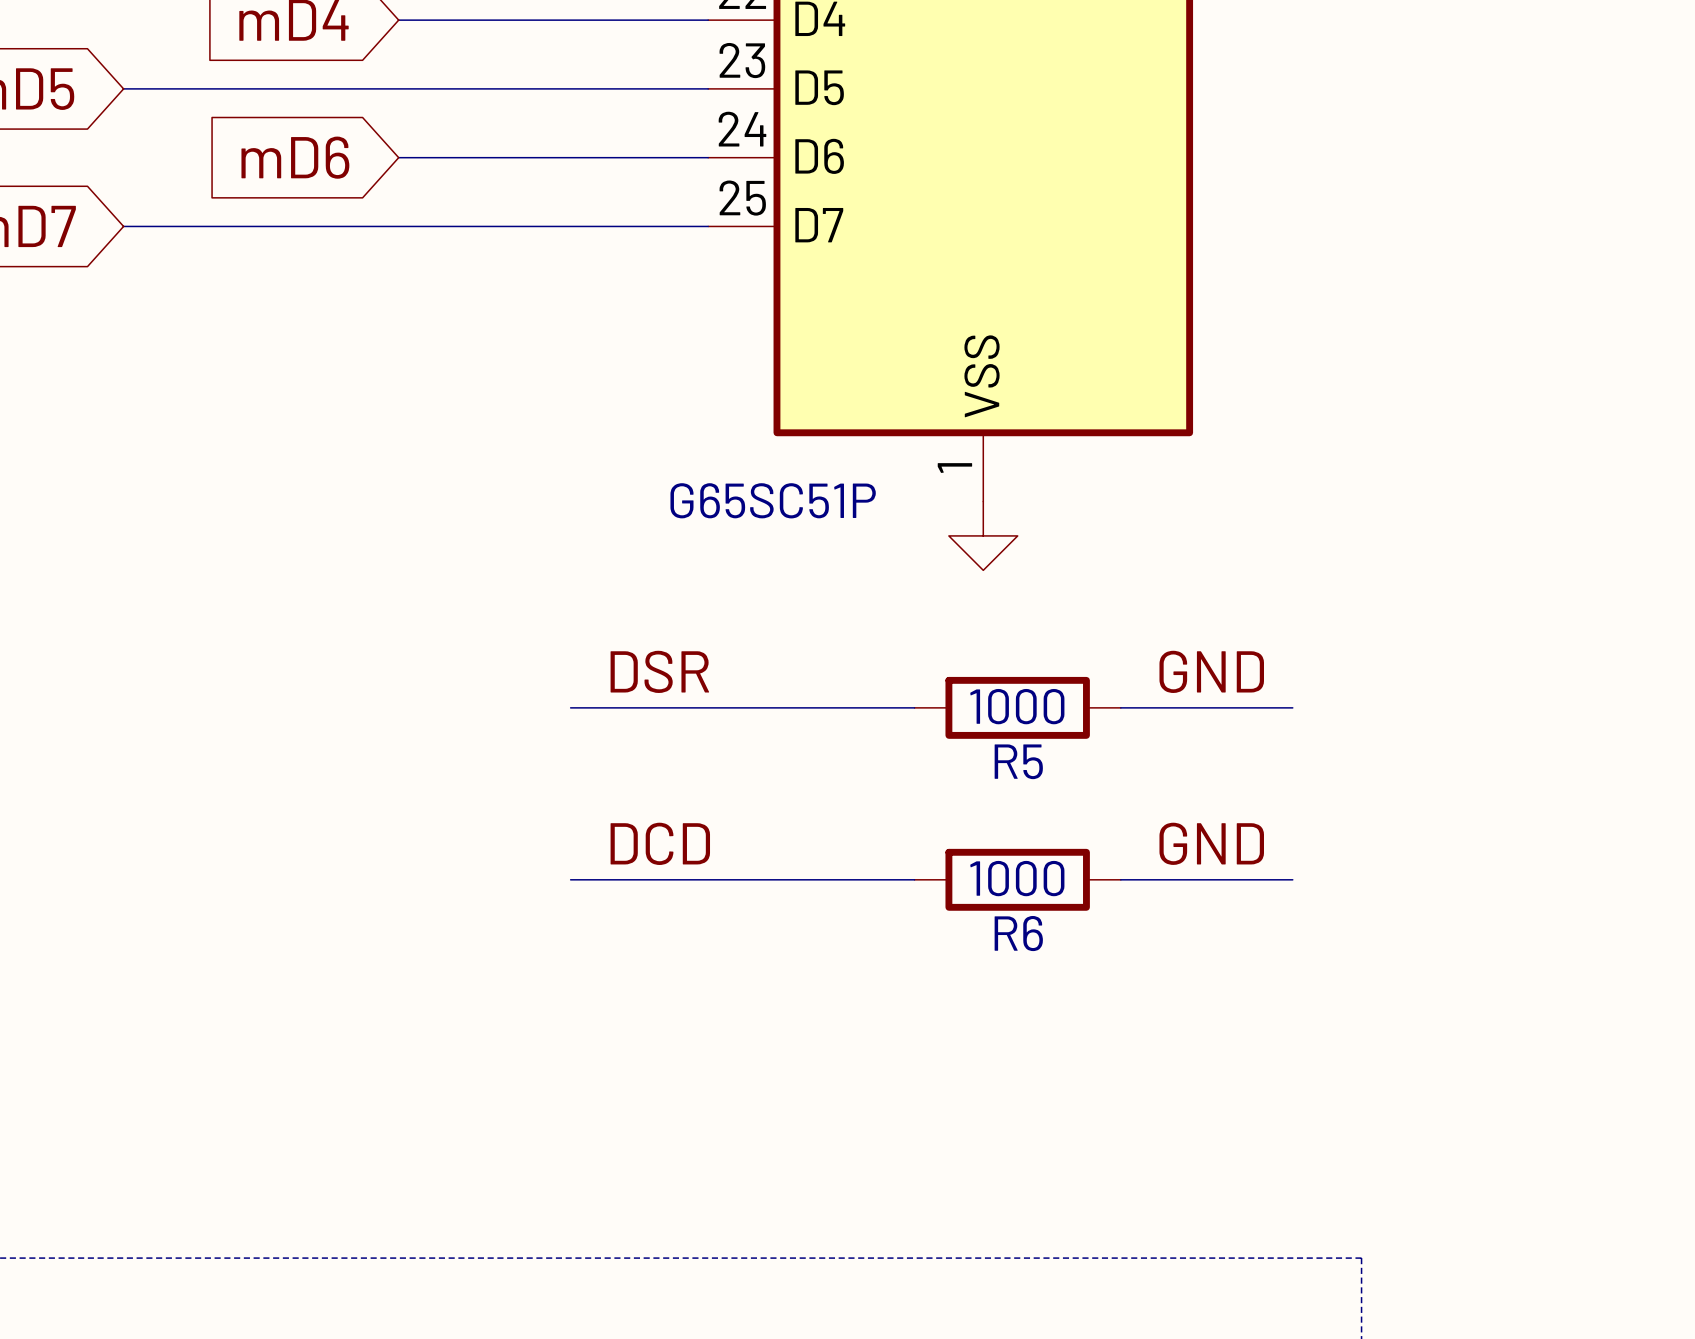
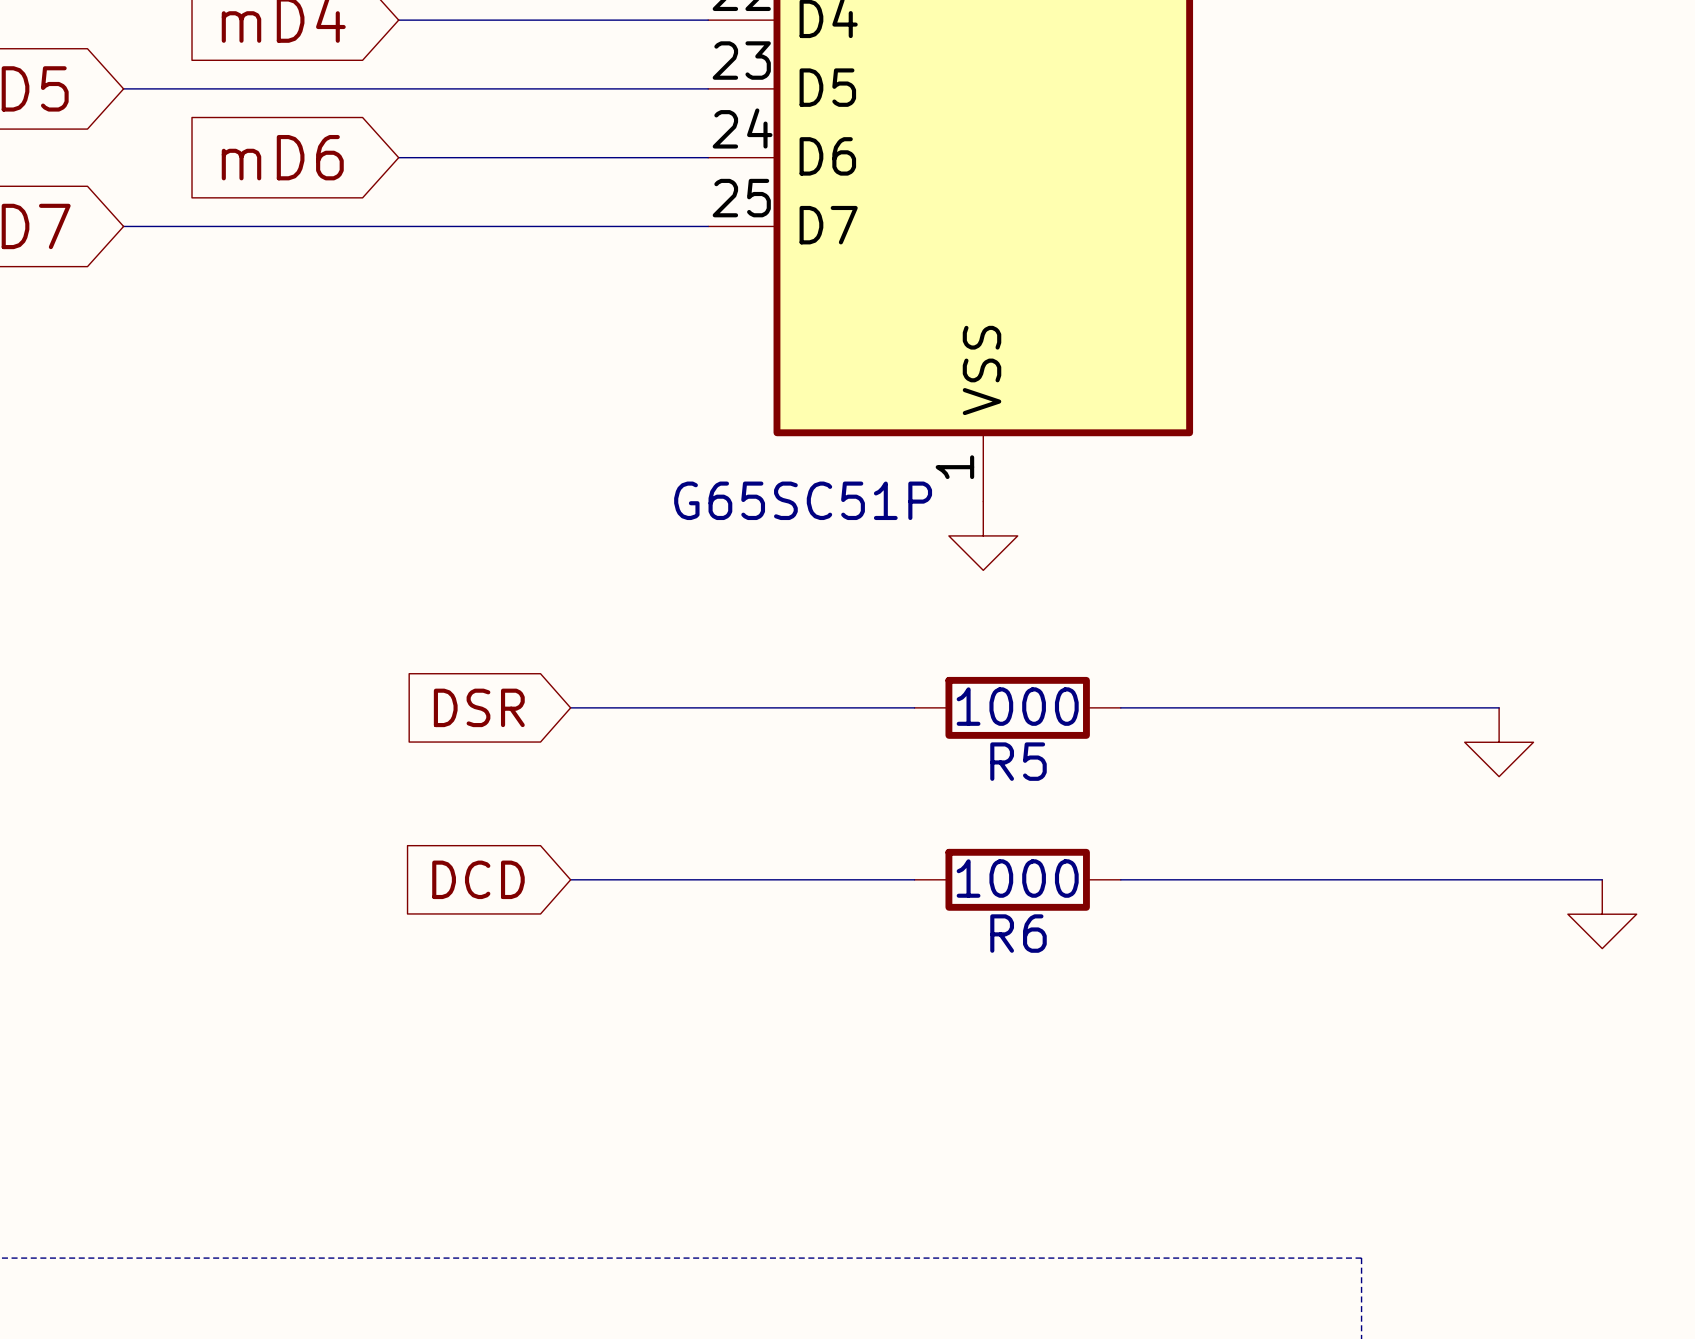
label: DSR (659, 671) -> none
label: GND (1211, 671) -> none
global label: none -> DSR (479, 707)
wire: none -> (1292, 707) (1499, 707)
power symbol: none -> (1499, 742)
label: DCD (660, 843) -> none
label: GND (1211, 843) -> none
global label: none -> DCD (478, 879)
wire: none -> (1292, 879) (1602, 879)
power symbol: none -> (1602, 914)

